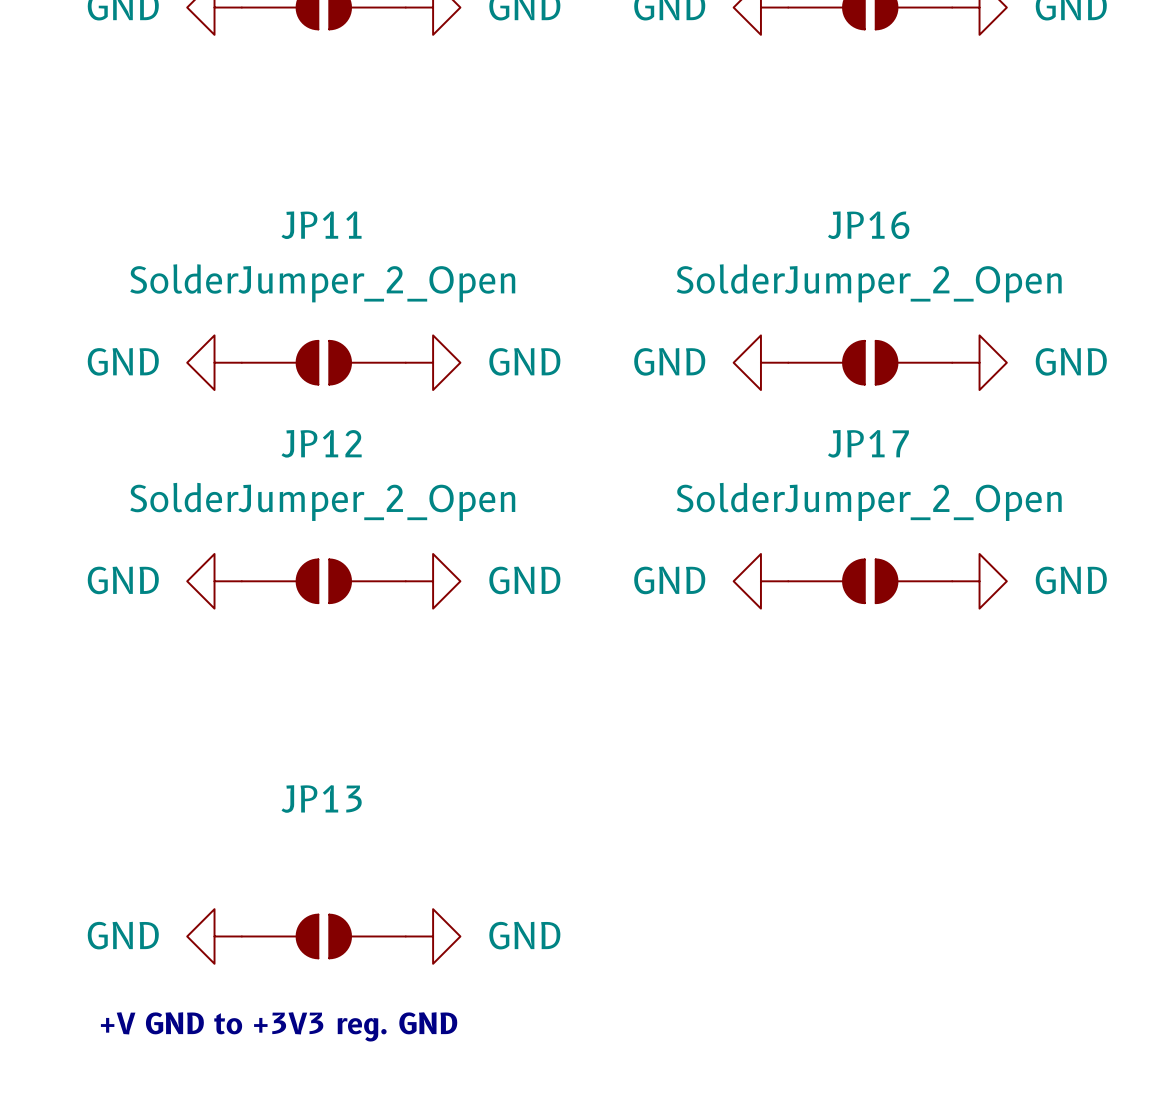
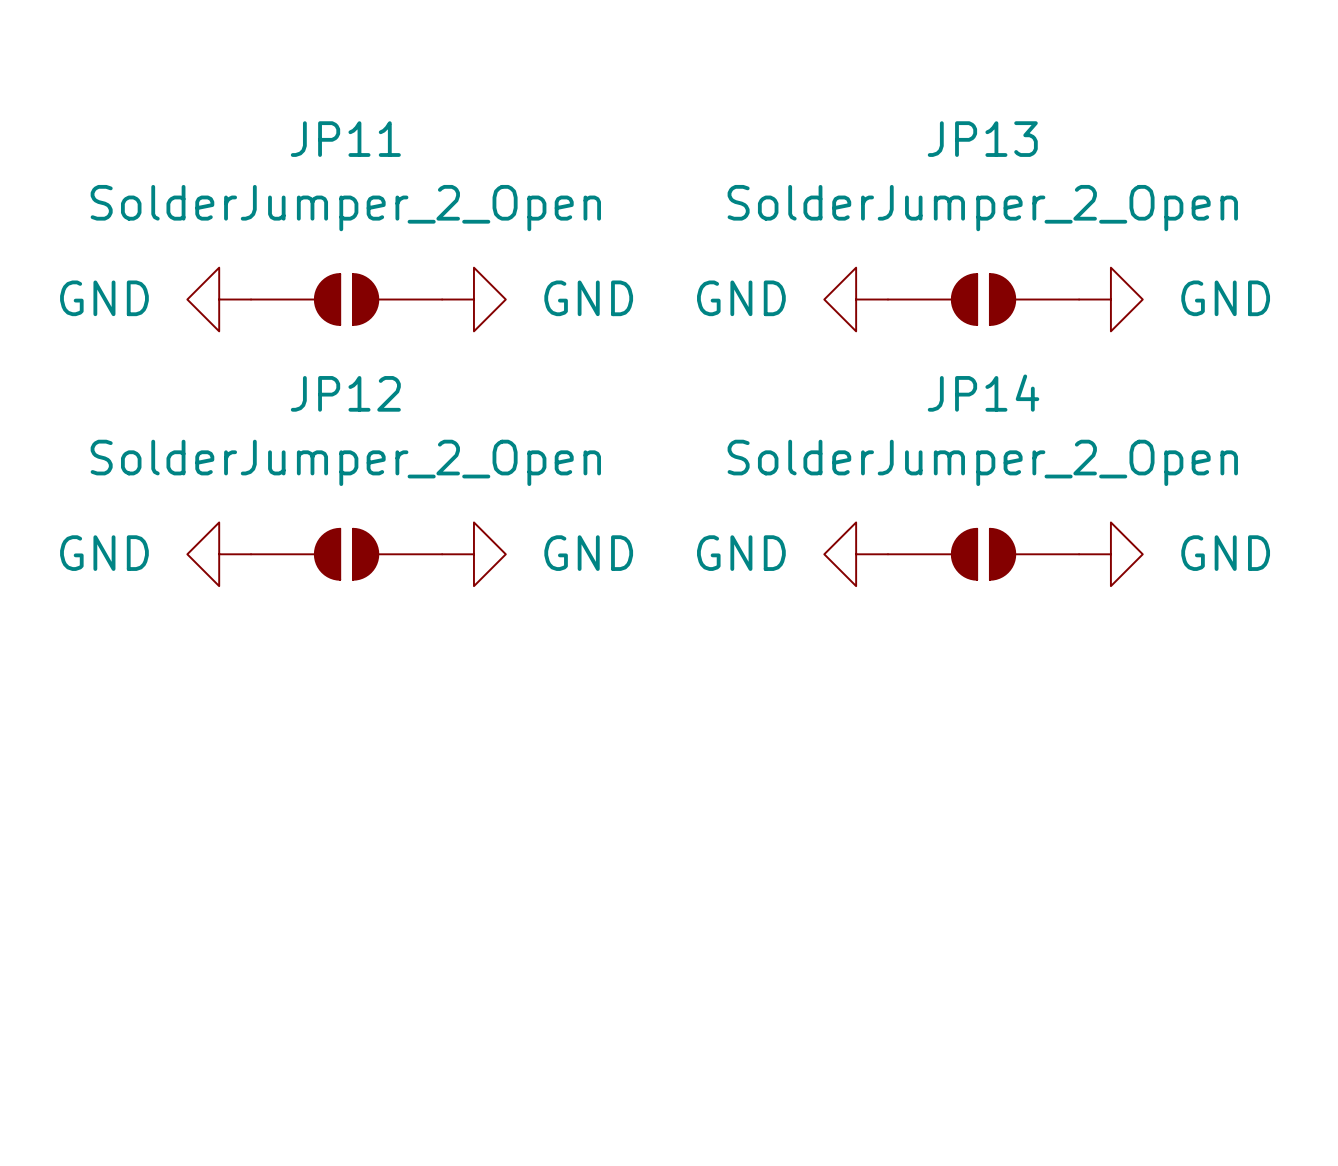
JP16 name: JP16 (868, 225) -> JP13 (982, 139)
JP17 name: JP17 (868, 443) -> JP14 (983, 393)
power symbol: GND (214, 936) -> none
JP13: (323, 936) -> none
power symbol: GND (433, 936) -> none
text: +V GND to +3V3 reg. GND (279, 1026) -> none

